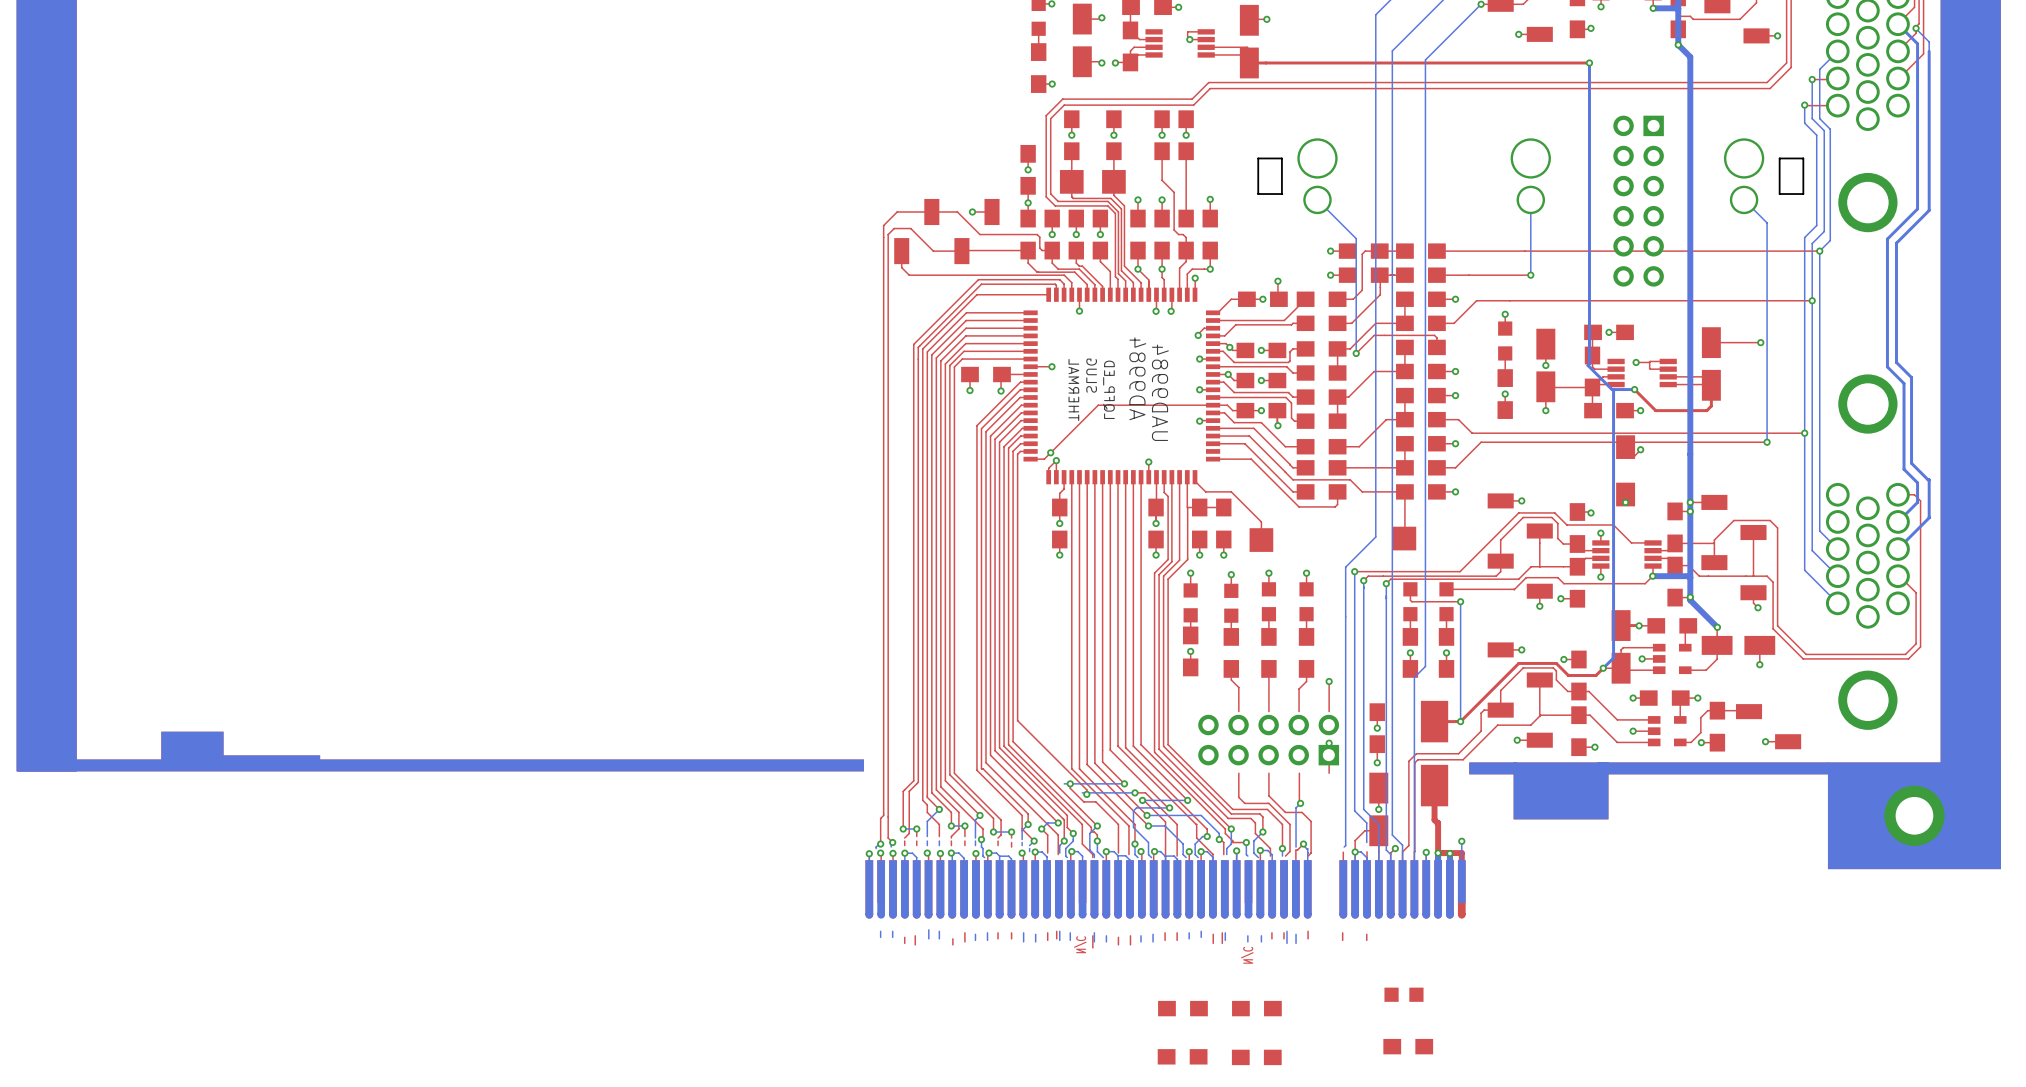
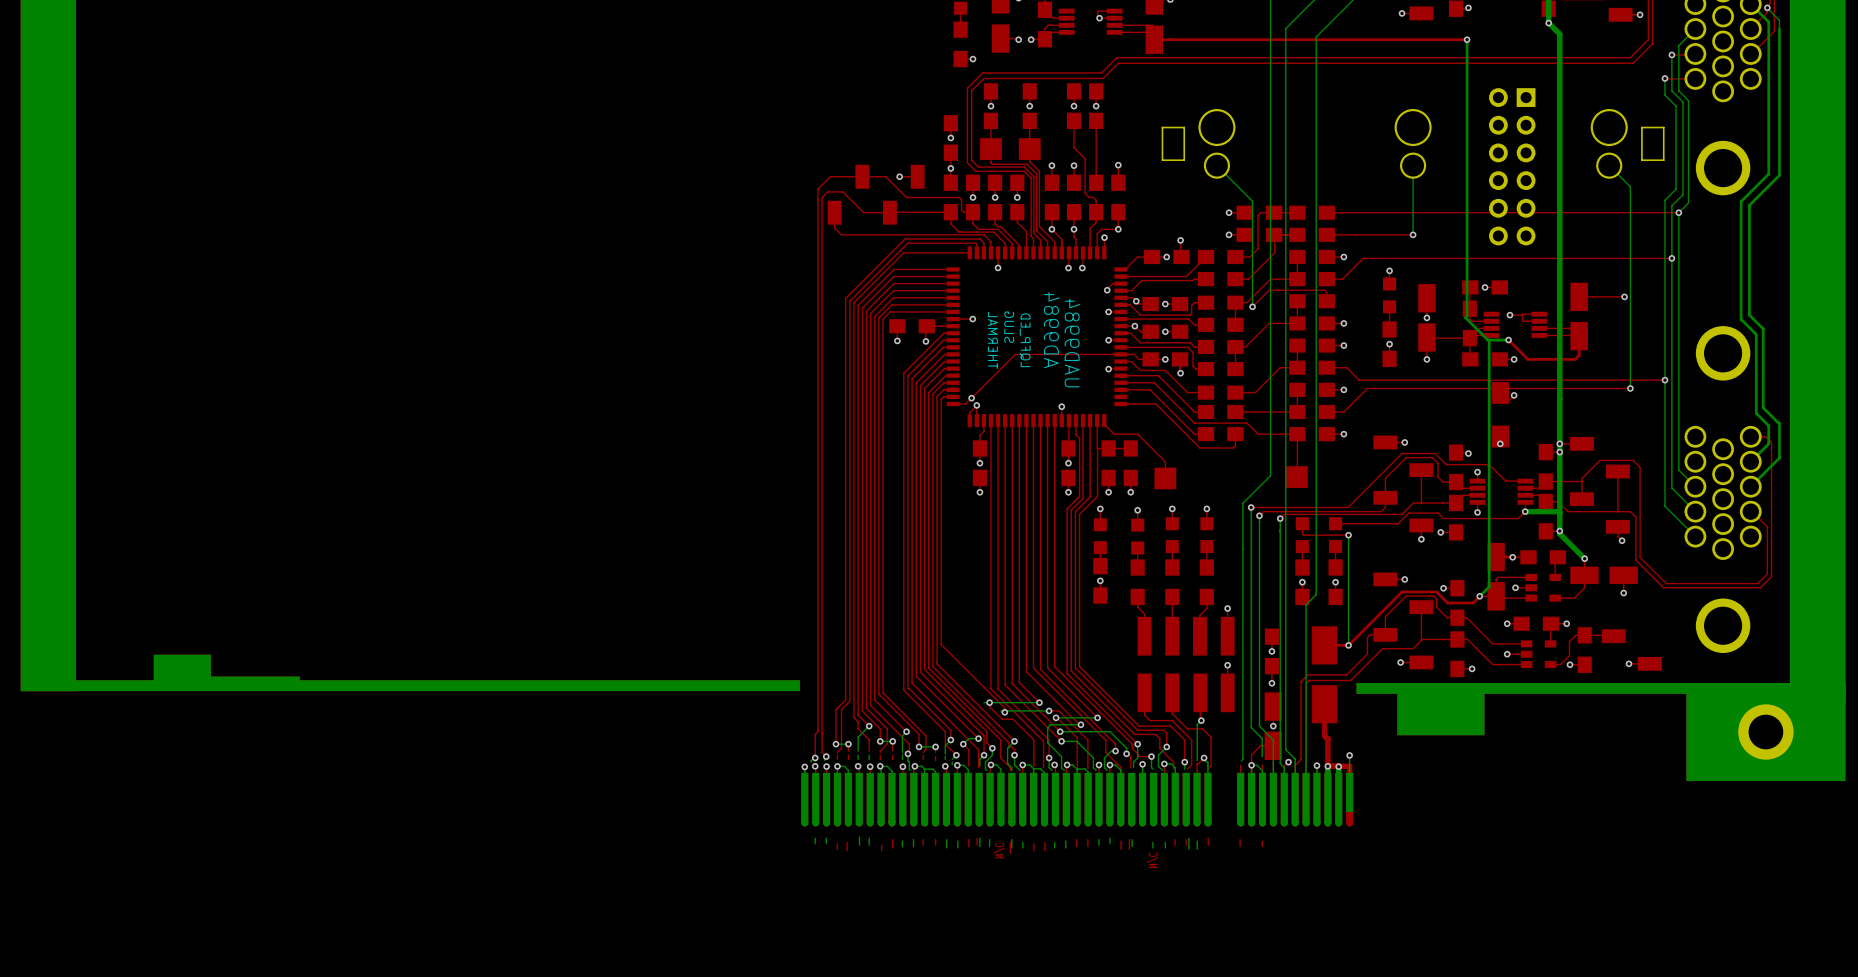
part: (1268, 740) -> none
part: none -> (1186, 664)
part: (1403, 994) -> none
part: (1182, 1008) -> none
part: (1256, 1008) -> none
part: (1408, 1046) -> none
part: (1182, 1056) -> none
part: (1256, 1057) -> none

